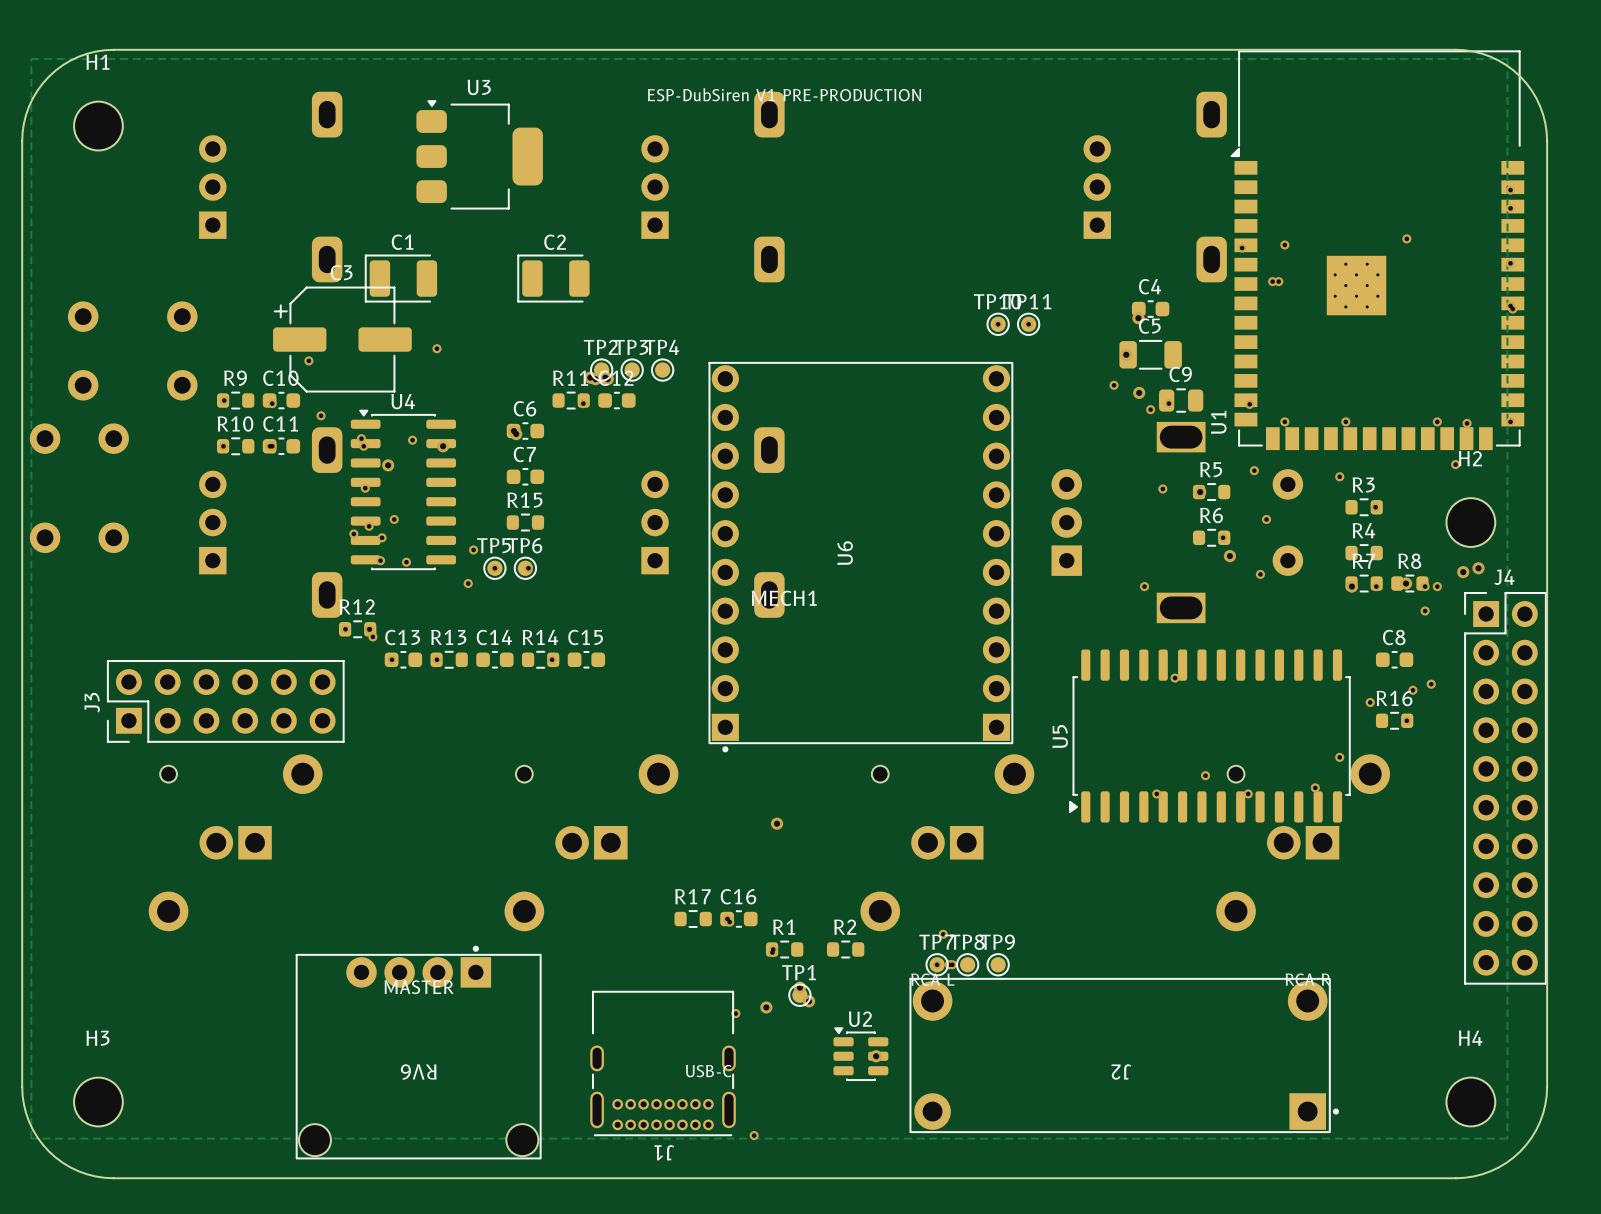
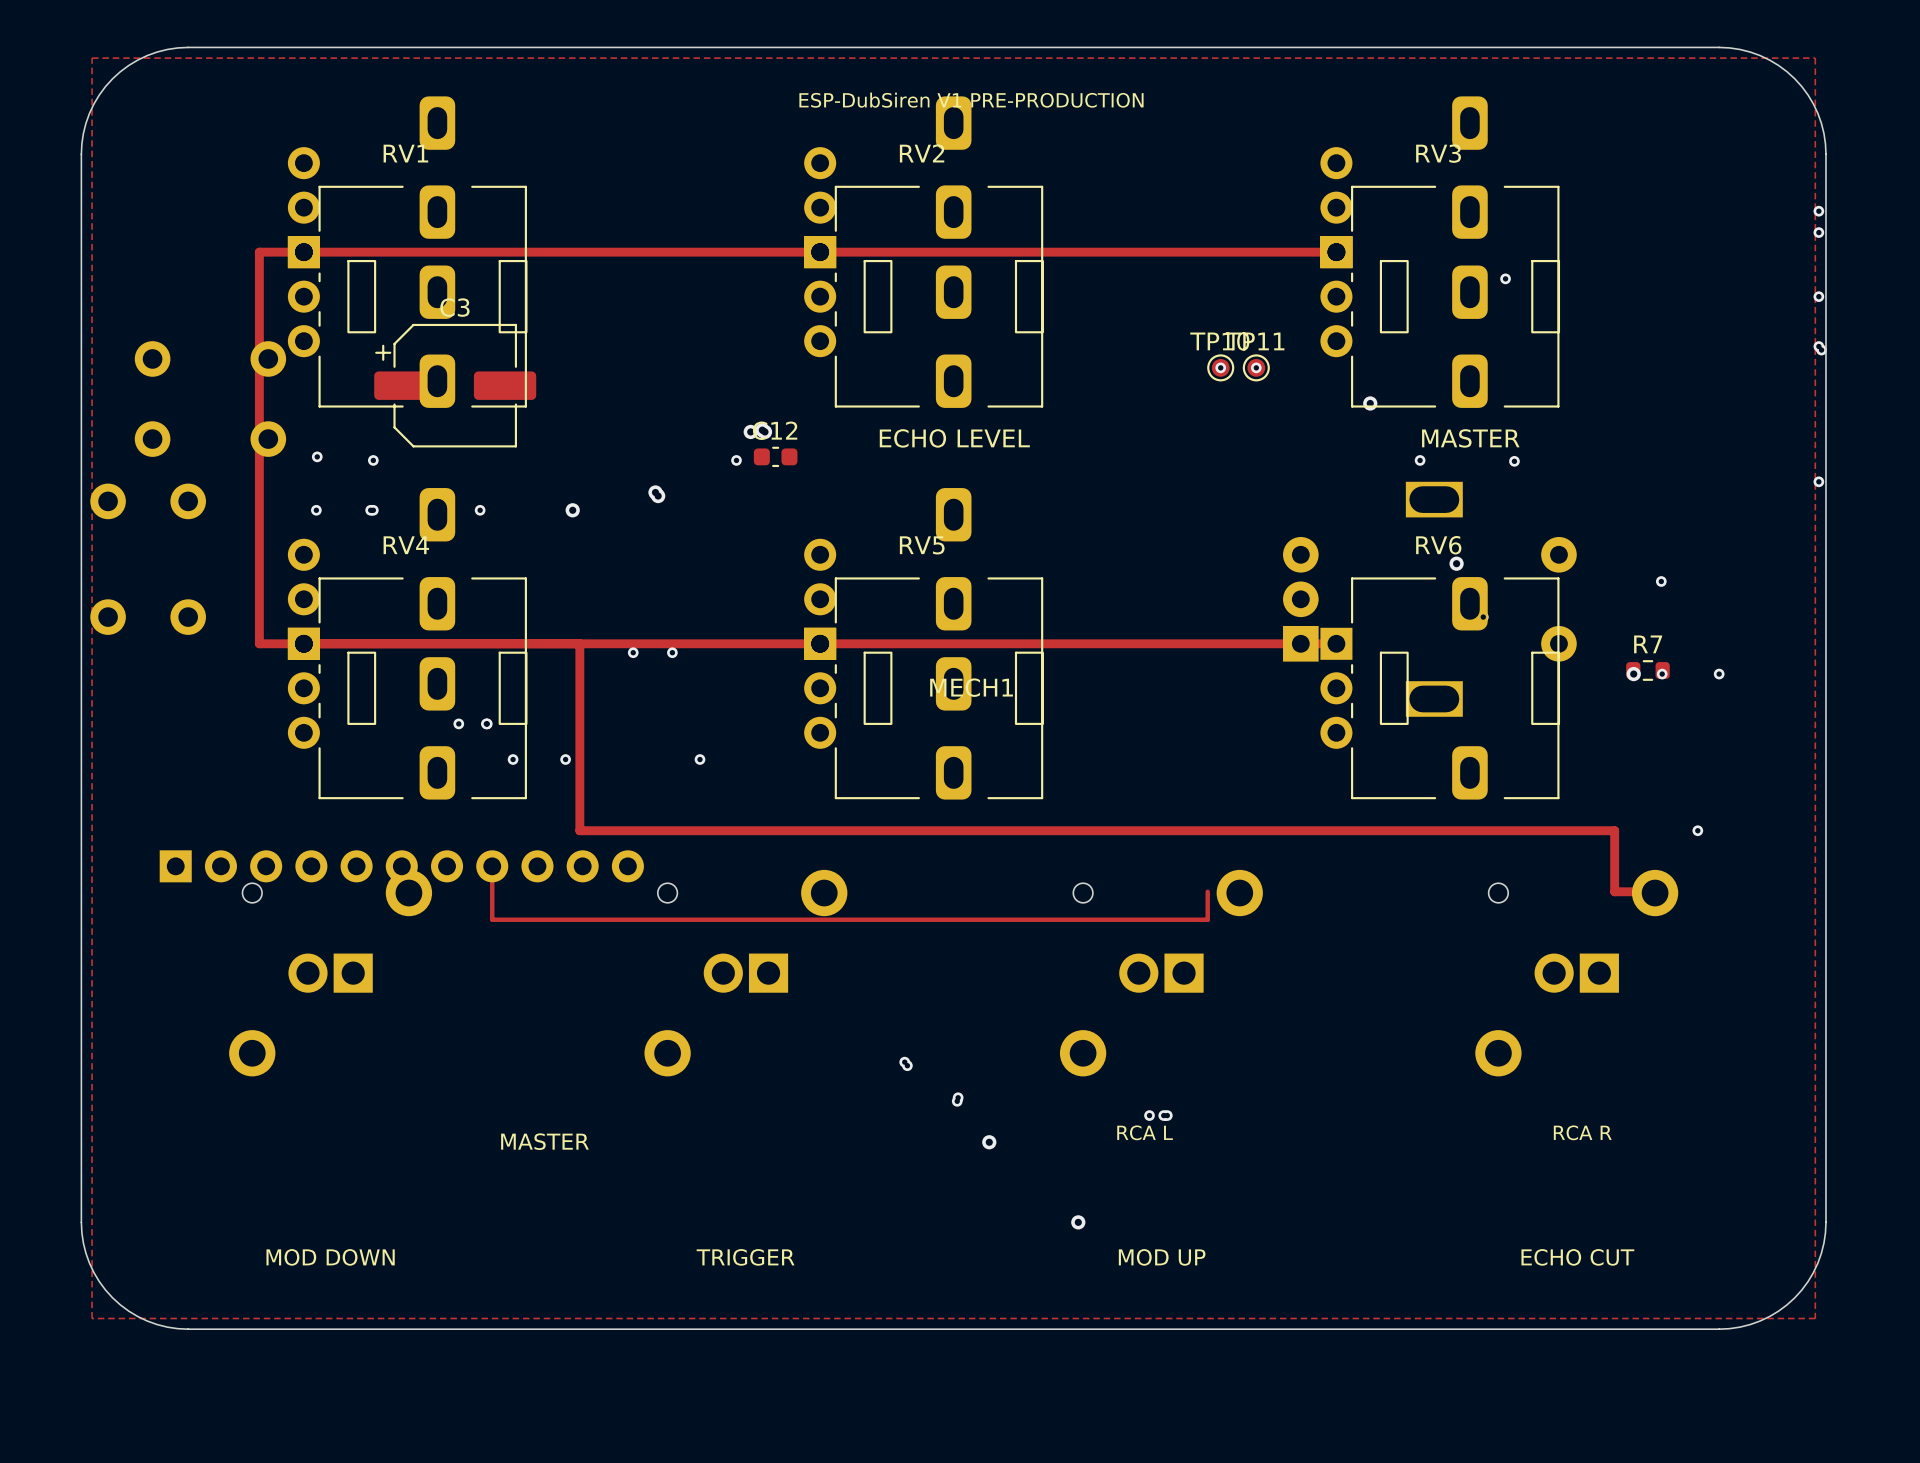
board edge: (1425, 49) (1473, 51) (1490, 56) (1506, 65) (1520, 76) (1536, 98) (1543, 114) (1546, 132) (1547, 1086) (1545, 1104) (1536, 1129) (1520, 1151) (1506, 1162) (1482, 1174) (1455, 1178) (104, 1177) (87, 1174) (70, 1167) (55, 1157) (37, 1137) (29, 1121) (23, 1104) (22, 1056) -> (1719, 47) (1740, 49) (1760, 55) (1778, 65) (1794, 78) (1807, 94) (1817, 113) (1823, 133) (1825, 154) (1825, 1222) (1823, 1243) (1813, 1272) (1794, 1297) (1778, 1311) (1750, 1324) (1719, 1329) (177, 1328) (157, 1324) (137, 1316) (112, 1297) (99, 1281) (89, 1263) (83, 1243) (81, 1222)
H1: (98, 126) -> none
U3: (479, 154) -> none
track: none -> (1336, 252) (259, 252) (259, 643) (1336, 643)
via: (1406, 238) -> none
via: (1284, 244) -> none
U1: (1377, 250) -> none
RV1: none -> (407, 296)
RV2: none -> (923, 296)
RV3: none -> (1440, 296)
C1: (400, 278) -> none
C2: (553, 278) -> none
via: (1272, 281) -> none
via: (1278, 281) -> none
C4: (1150, 309) -> none
via: (1138, 318) -> none
via: (436, 348) -> none
C5: (1150, 354) -> none
via: (308, 360) -> none
TP2: (601, 370) -> none
TP3: (632, 370) -> none
TP4: (662, 370) -> none
via: (590, 377) -> none
text: none -> ECHO LEVEL (954, 438)
text: none -> MASTER (1470, 438)
via: (1114, 385) -> none
via: (1139, 392) -> none
R9: (235, 400) -> none
C10: (281, 400) -> none
R11: (571, 400) -> none
C9: (1181, 400) -> none
via: (1150, 409) -> none
via: (321, 415) -> none
via: (1284, 421) -> none
via: (1345, 421) -> none
via: (1437, 421) -> none
via: (1467, 423) -> none
C6: (525, 431) -> none
via: (361, 438) -> none
via: (412, 440) -> none
R10: (235, 446) -> none
C11: (281, 446) -> none
via: (1455, 464) -> none
via: (388, 465) -> none
via: (1254, 470) -> none
C7: (525, 476) -> none
via: (1339, 476) -> none
via: (365, 488) -> none
via: (1162, 488) -> none
U4: (403, 489) -> none
R5: (1211, 492) -> none
R3: (1364, 507) -> none
via: (394, 519) -> none
via: (1266, 519) -> none
R15: (525, 522) -> none
H2: (1470, 522) -> none
via: (369, 526) -> none
via: (353, 533) -> none
via: (382, 537) -> none
R6: (1211, 537) -> none
via: (473, 549) -> none
R4: (1364, 553) -> none
via: (1229, 556) -> none
U6: (860, 557) -> none
via: (380, 560) -> none
track: none -> (579, 643) (579, 830) (1614, 830) (1614, 891) (1659, 891)
via: (406, 562) -> none
TP5: (494, 568) -> none
TP6: (525, 568) -> none
via: (1478, 568) -> none
via: (1463, 572) -> none
via: (1260, 574) -> none
via: (468, 583) -> none
via: (1406, 583) -> none
R8: (1409, 583) -> none
via: (1144, 586) -> none
via: (1437, 586) -> none
RV4: none -> (407, 688)
RV5: none -> (923, 688)
via: (1425, 610) -> none
R12: (357, 629) -> none
via: (372, 636) -> none
C13: (403, 659) -> none
R13: (449, 659) -> none
C14: (494, 659) -> none
R14: (540, 659) -> none
C15: (586, 659) -> none
C8: (1394, 659) -> none
via: (1175, 678) -> none
via: (1431, 684) -> none
via: (1412, 690) -> none
J3: (225, 701) -> none
via: (1370, 702) -> none
R16: (1394, 720) -> none
U5: (1209, 736) -> none
part: none -> (401, 866)
track: none -> (492, 866) (492, 919) (1207, 919) (1207, 891)
via: (1339, 757) -> none
via: (1205, 775) -> none
via: (1315, 787) -> none
J4: (1505, 788) -> none
via: (1156, 793) -> none
via: (1248, 793) -> none
via: (777, 823) -> none
R17: (693, 919) -> none
C16: (738, 919) -> none
via: (943, 934) -> none
RV6 footprint: [295, 945, 542, 1160] -> [1320, 577, 1561, 800]
R1: (784, 949) -> none
R2: (845, 949) -> none
TP7: (937, 964) -> none
TP8: (967, 964) -> none
TP9: (998, 964) -> none
TP1: (799, 995) -> none
via: (809, 1001) -> none
via: (766, 1007) -> none
via: (735, 1013) -> none
U2: (860, 1054) -> none
J2: (1124, 1055) -> none
J1: (663, 1063) -> none
RV6 name position: RV6 (418, 1071) -> RV6 (1438, 545)
text: USB-C (708, 1071) -> none
text: none -> MOD DOWN (330, 1257)
text: none -> TRIGGER (745, 1257)
text: none -> MOD UP (1162, 1257)
text: none -> ECHO CUT (1577, 1257)
H3: (98, 1102) -> none
H4: (1470, 1102) -> none
via: (754, 1135) -> none

